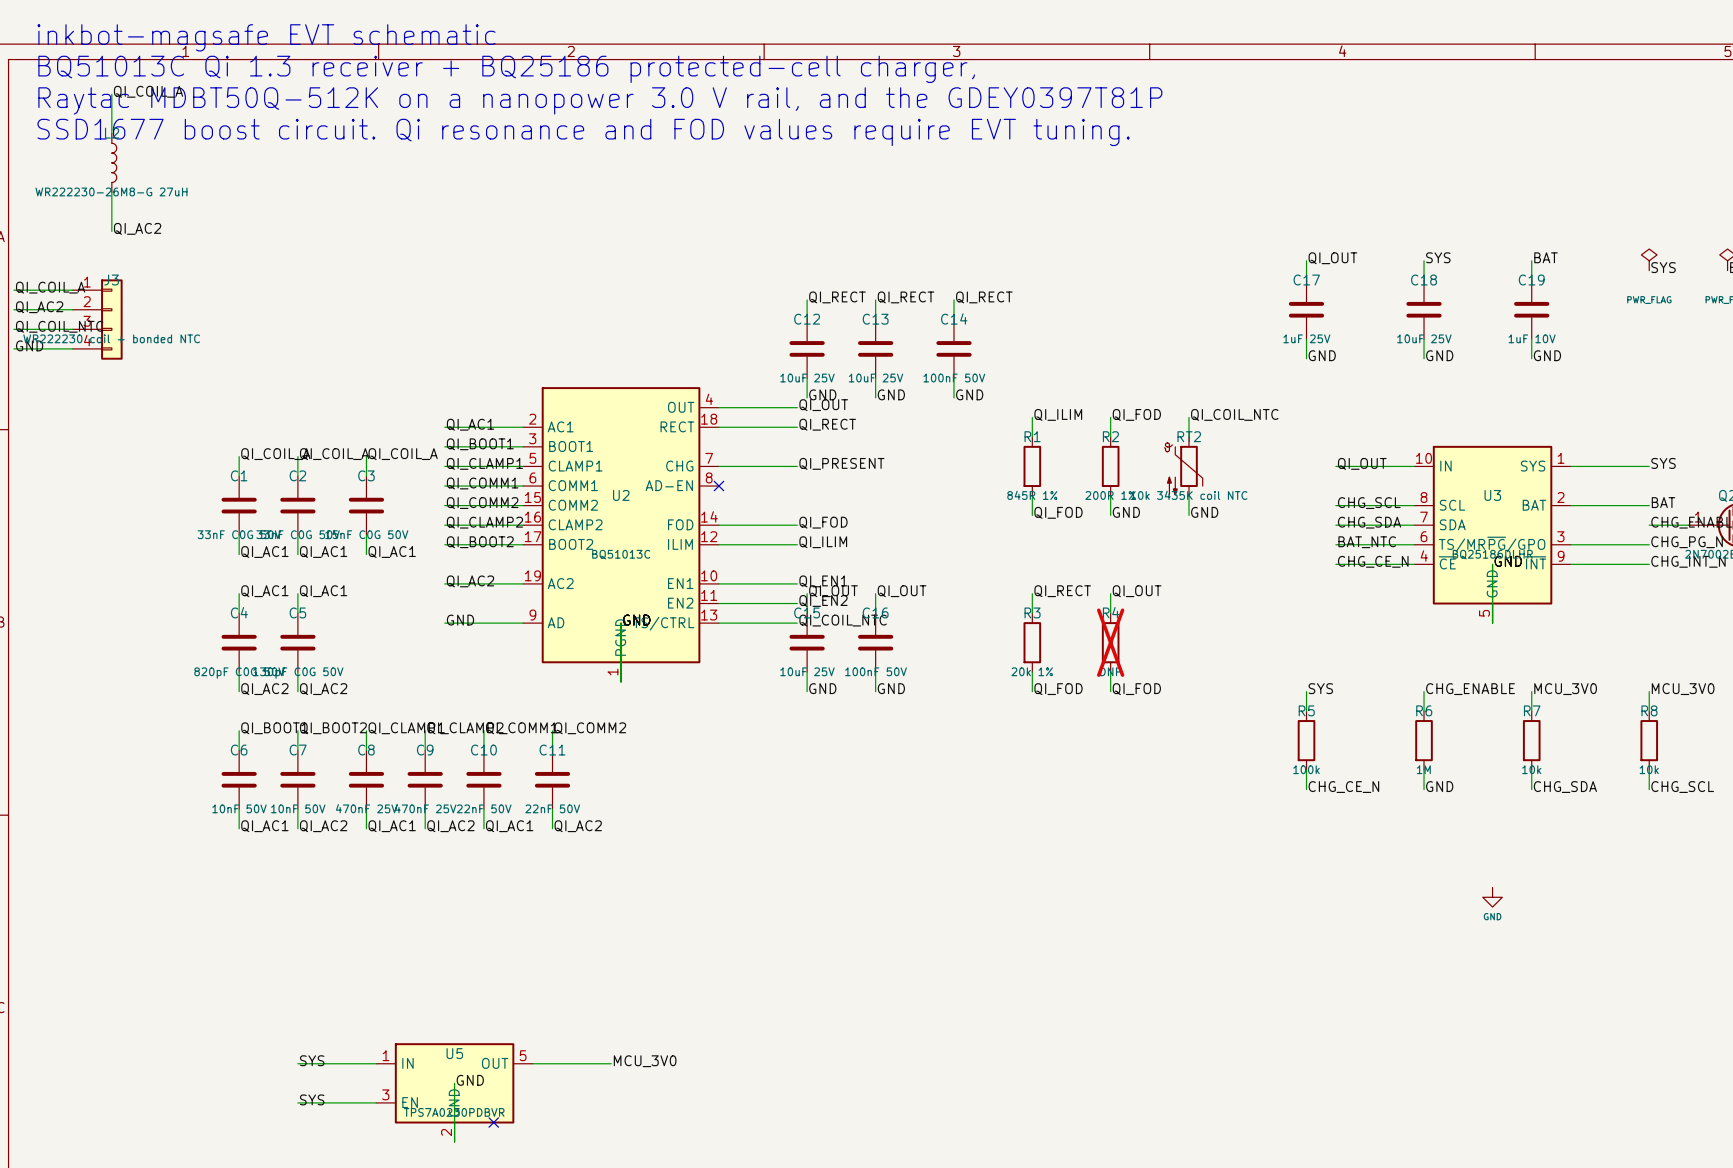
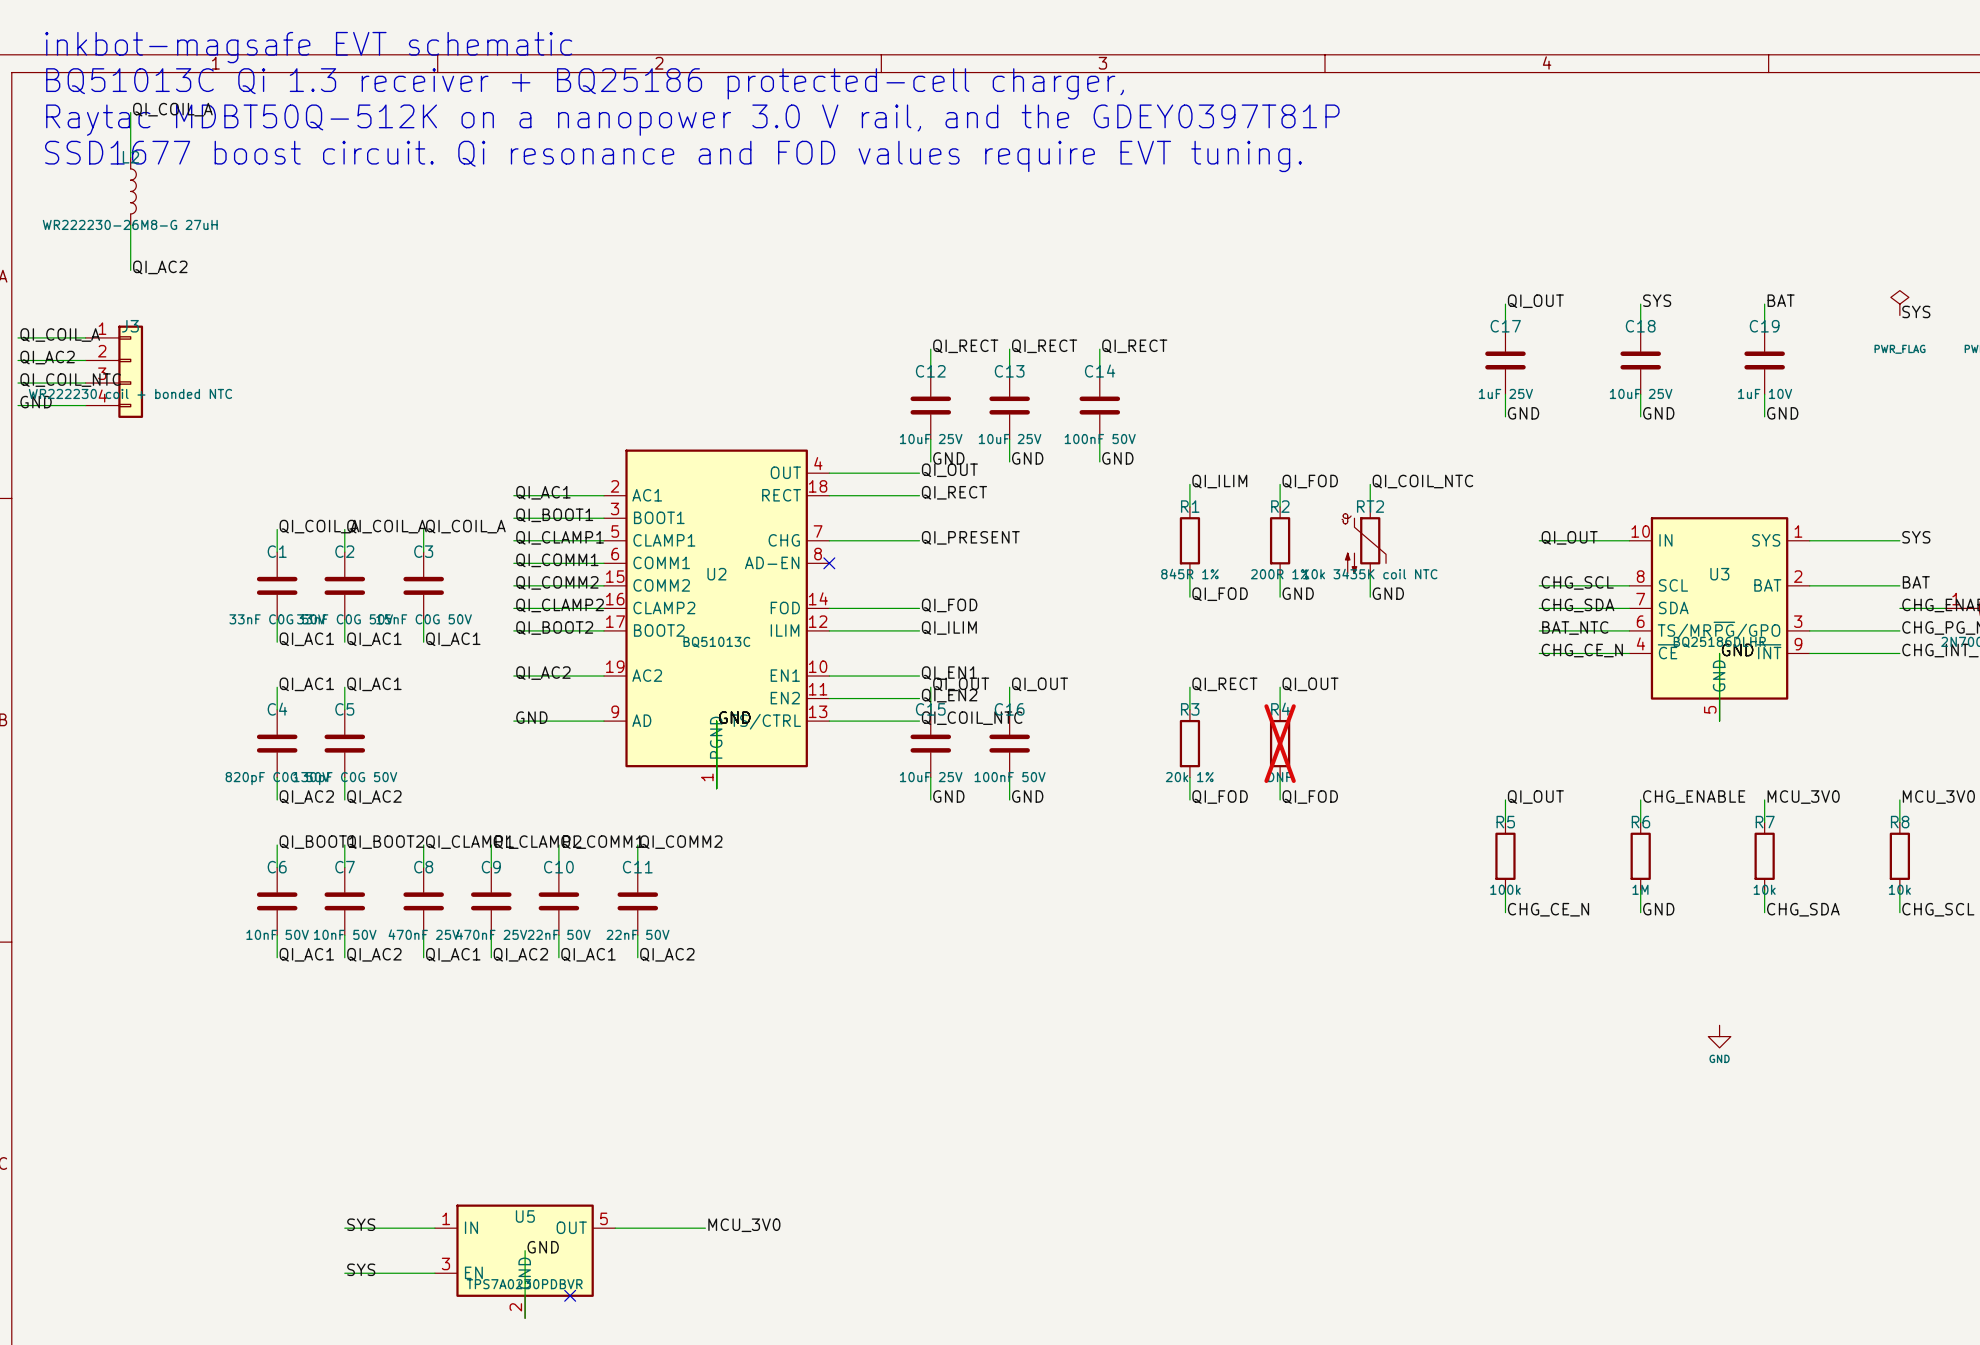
label: SYS (1320, 688) -> QI_OUT (1535, 797)

